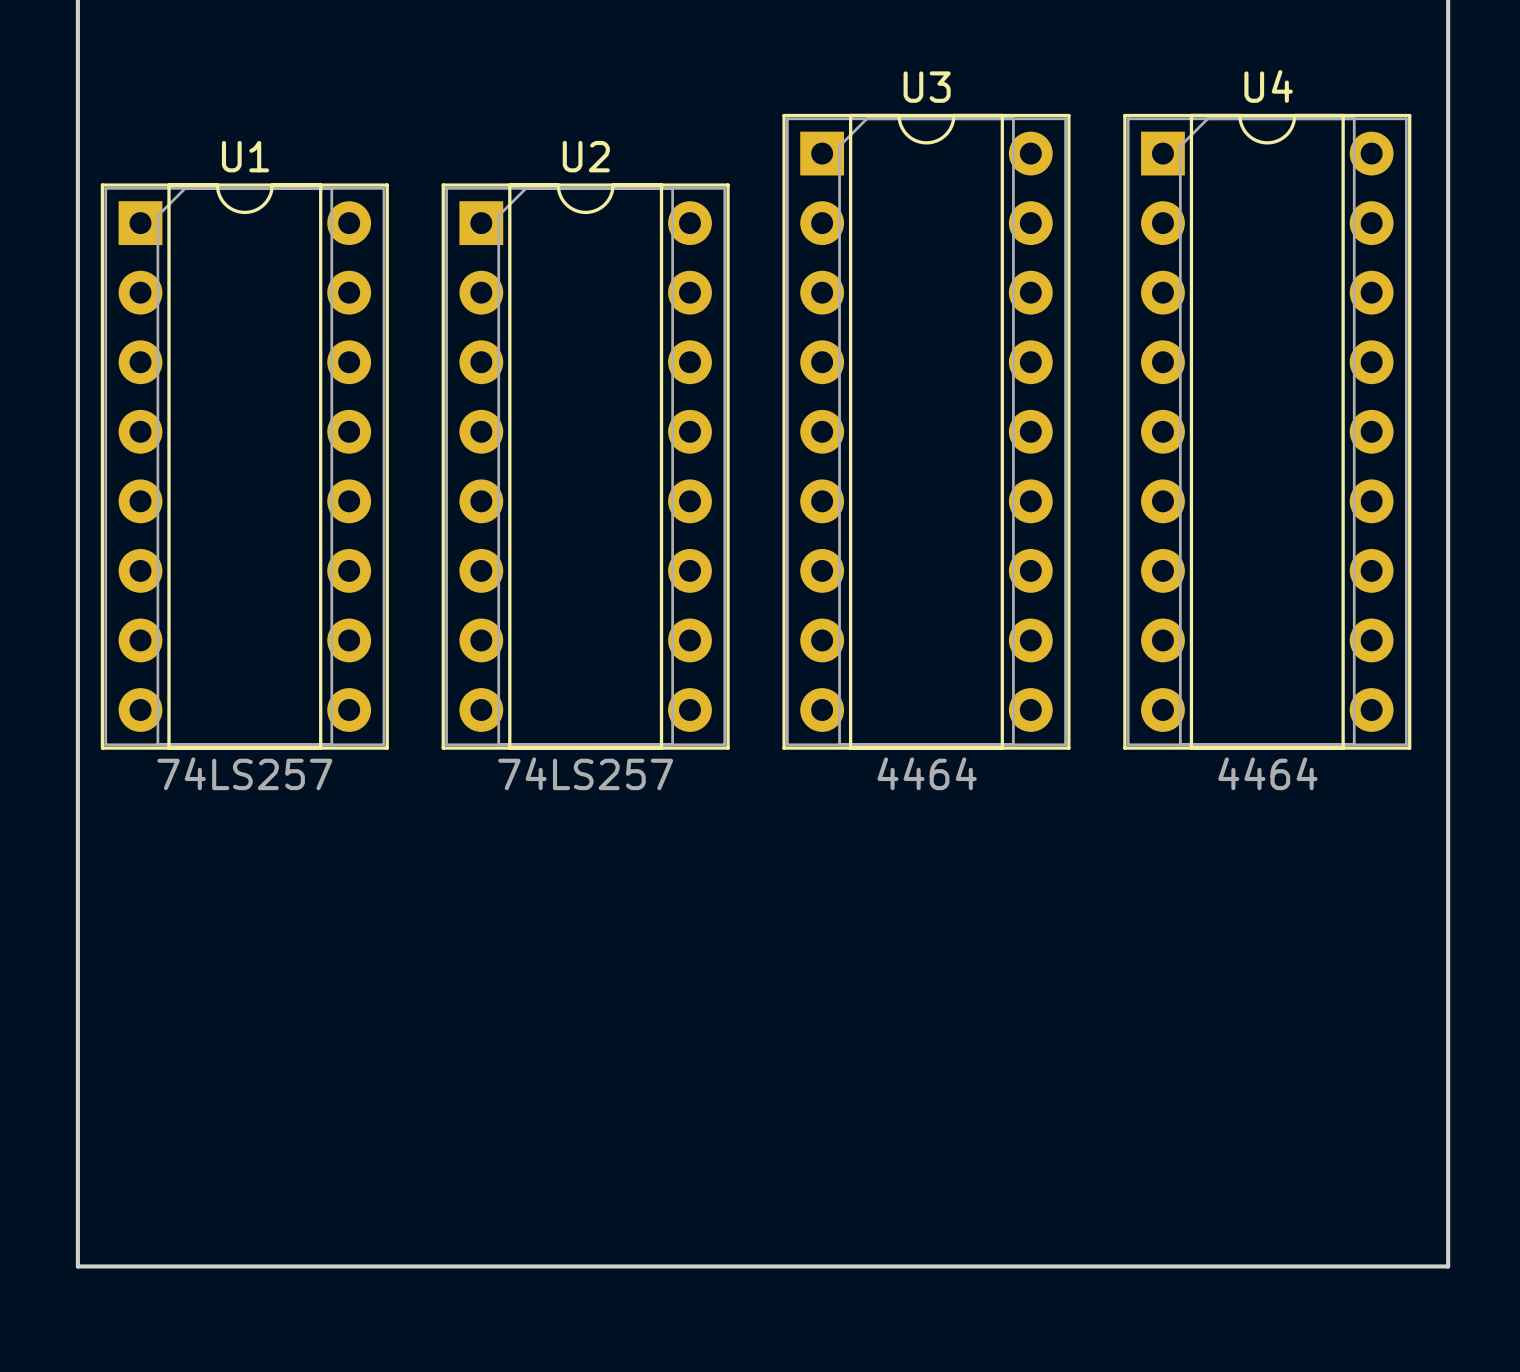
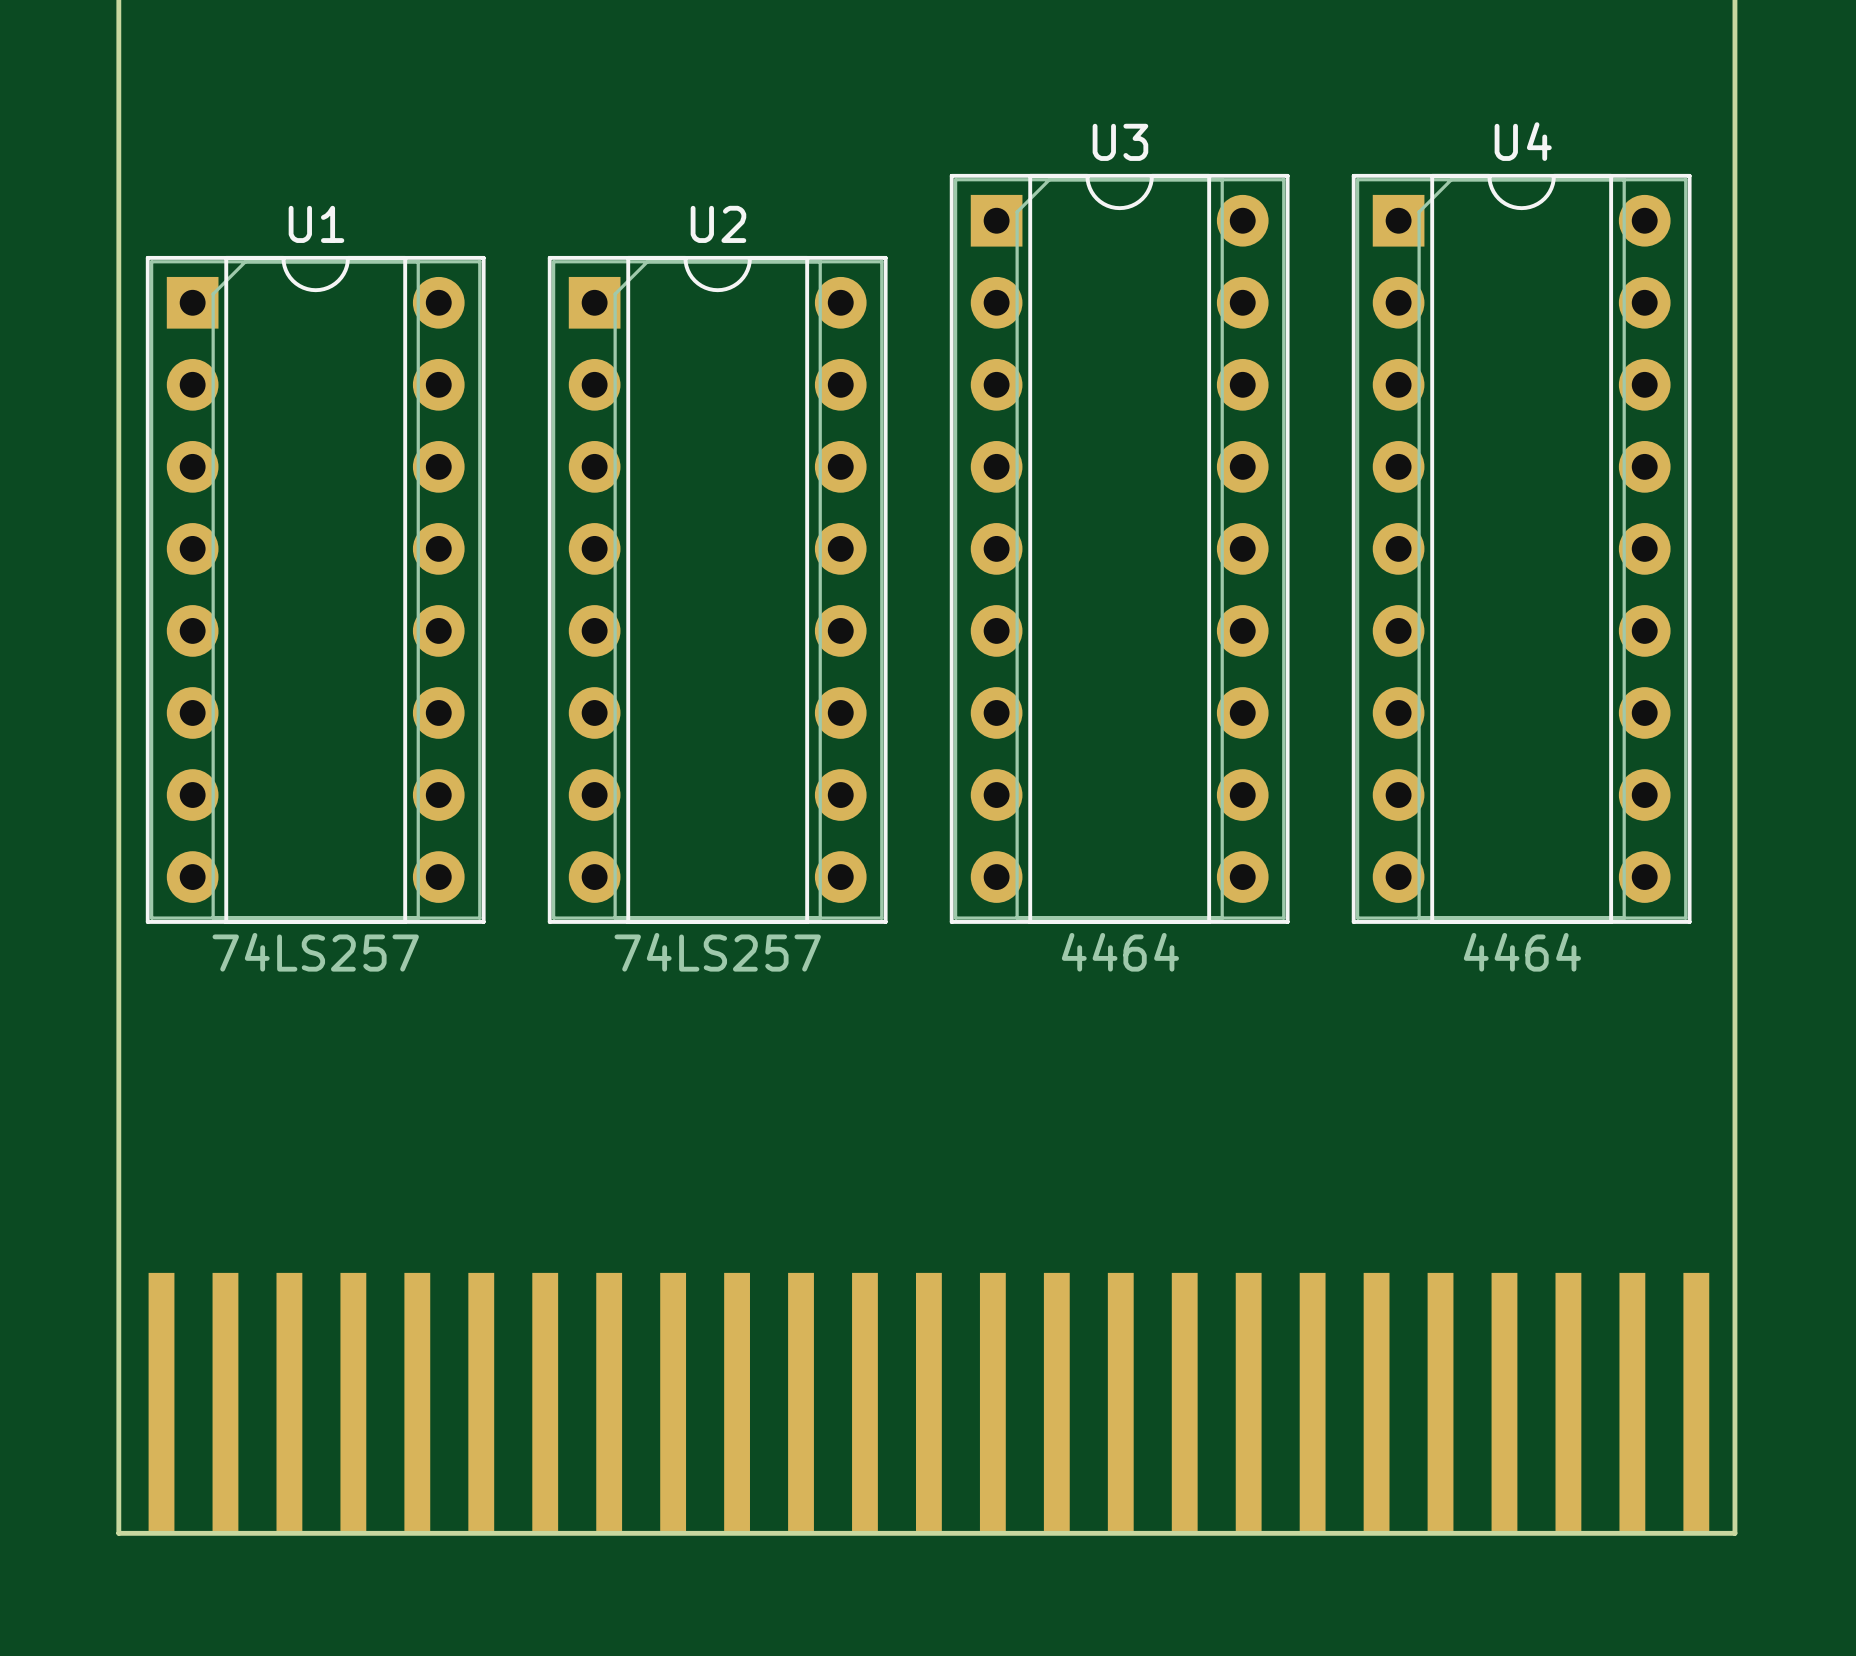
part: none -> (928, 1402)

